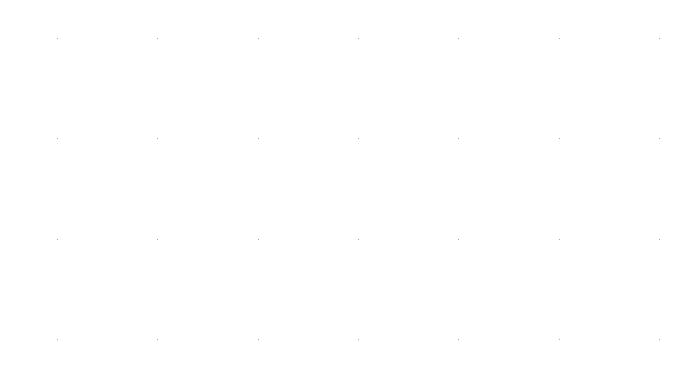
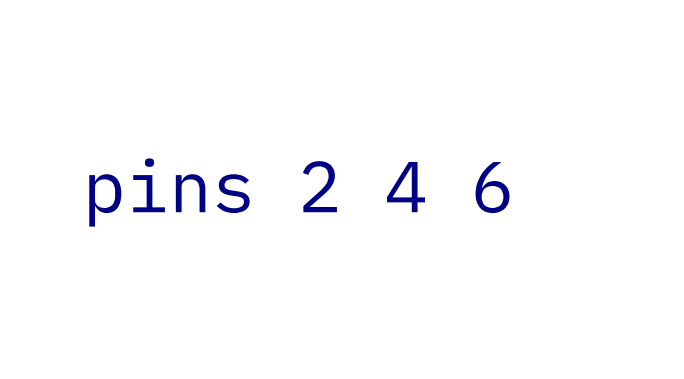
text: none -> pins 2 4 6 (299, 192)

